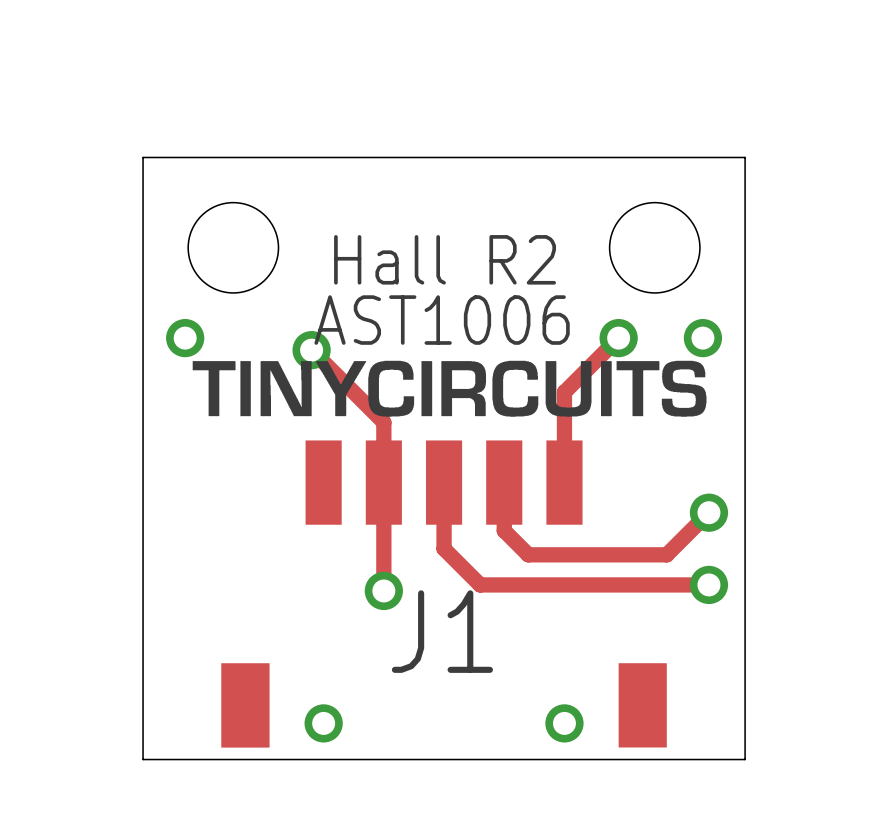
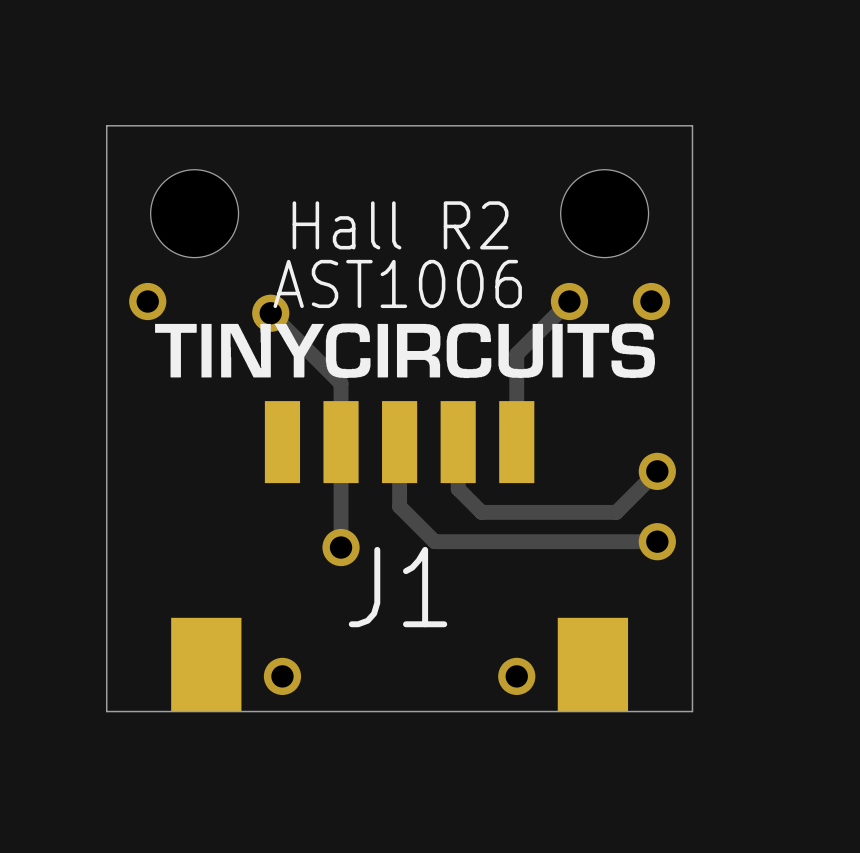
J1 footprint: [221, 440, 667, 748] -> [171, 401, 629, 712]

